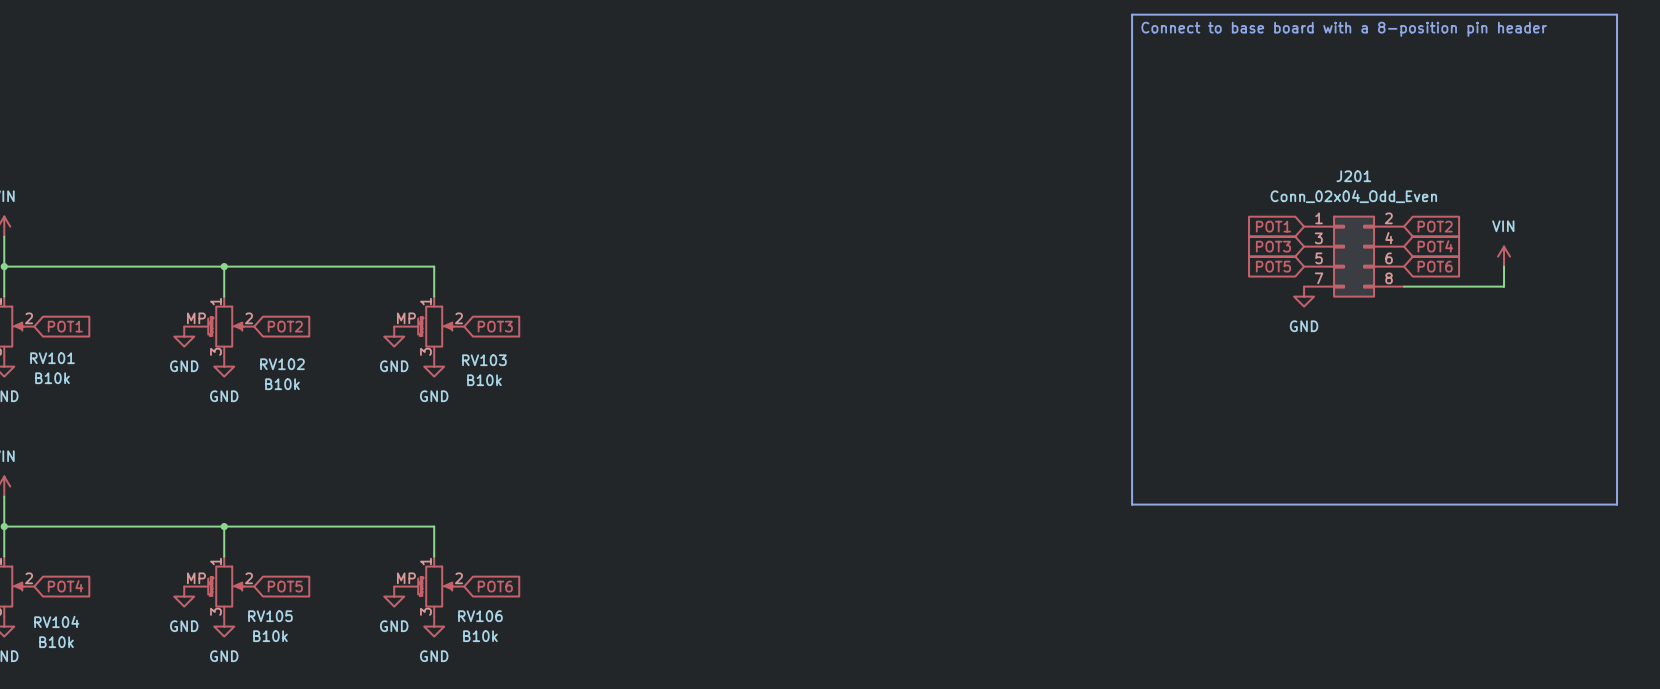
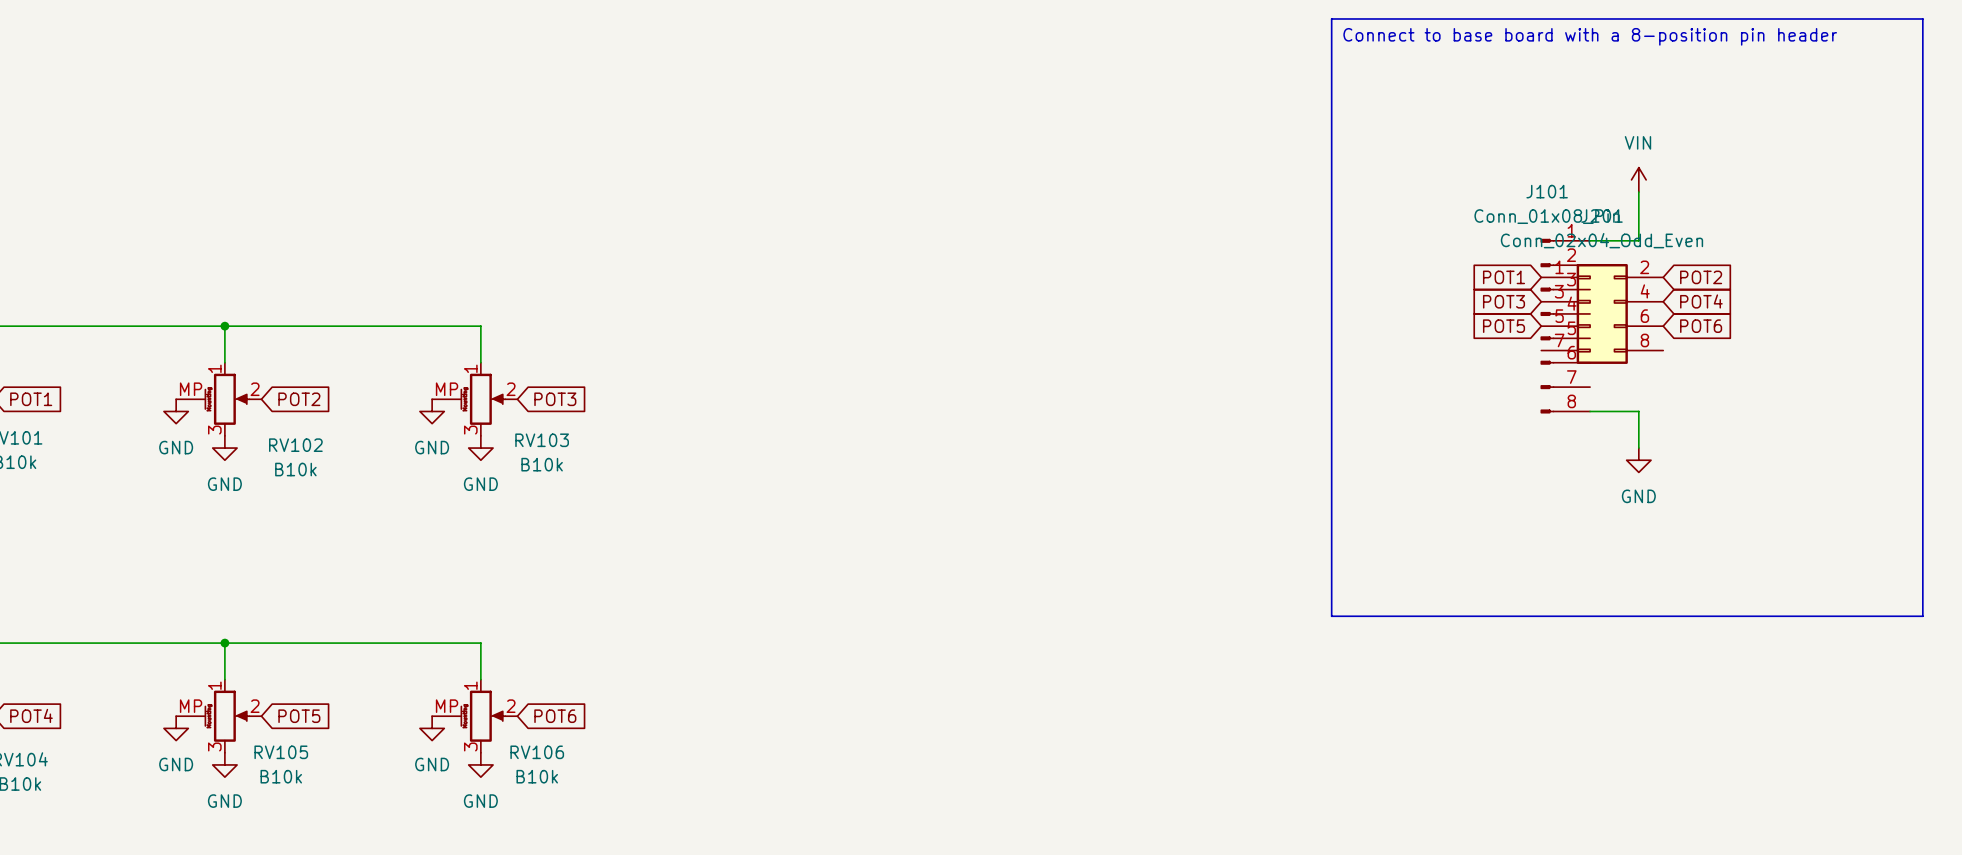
wire: none -> (1638, 192) (1638, 240) (1590, 240)
power symbol position: VIN (1504, 256) -> VIN (1638, 179)
J101: none -> Conn_01x08_Pin (1565, 326)
wire: (1504, 266) (1504, 286) (1404, 286) -> none
power symbol position: GND (1304, 296) -> GND (1638, 460)
wire: none -> (1590, 411) (1638, 411) (1638, 448)

